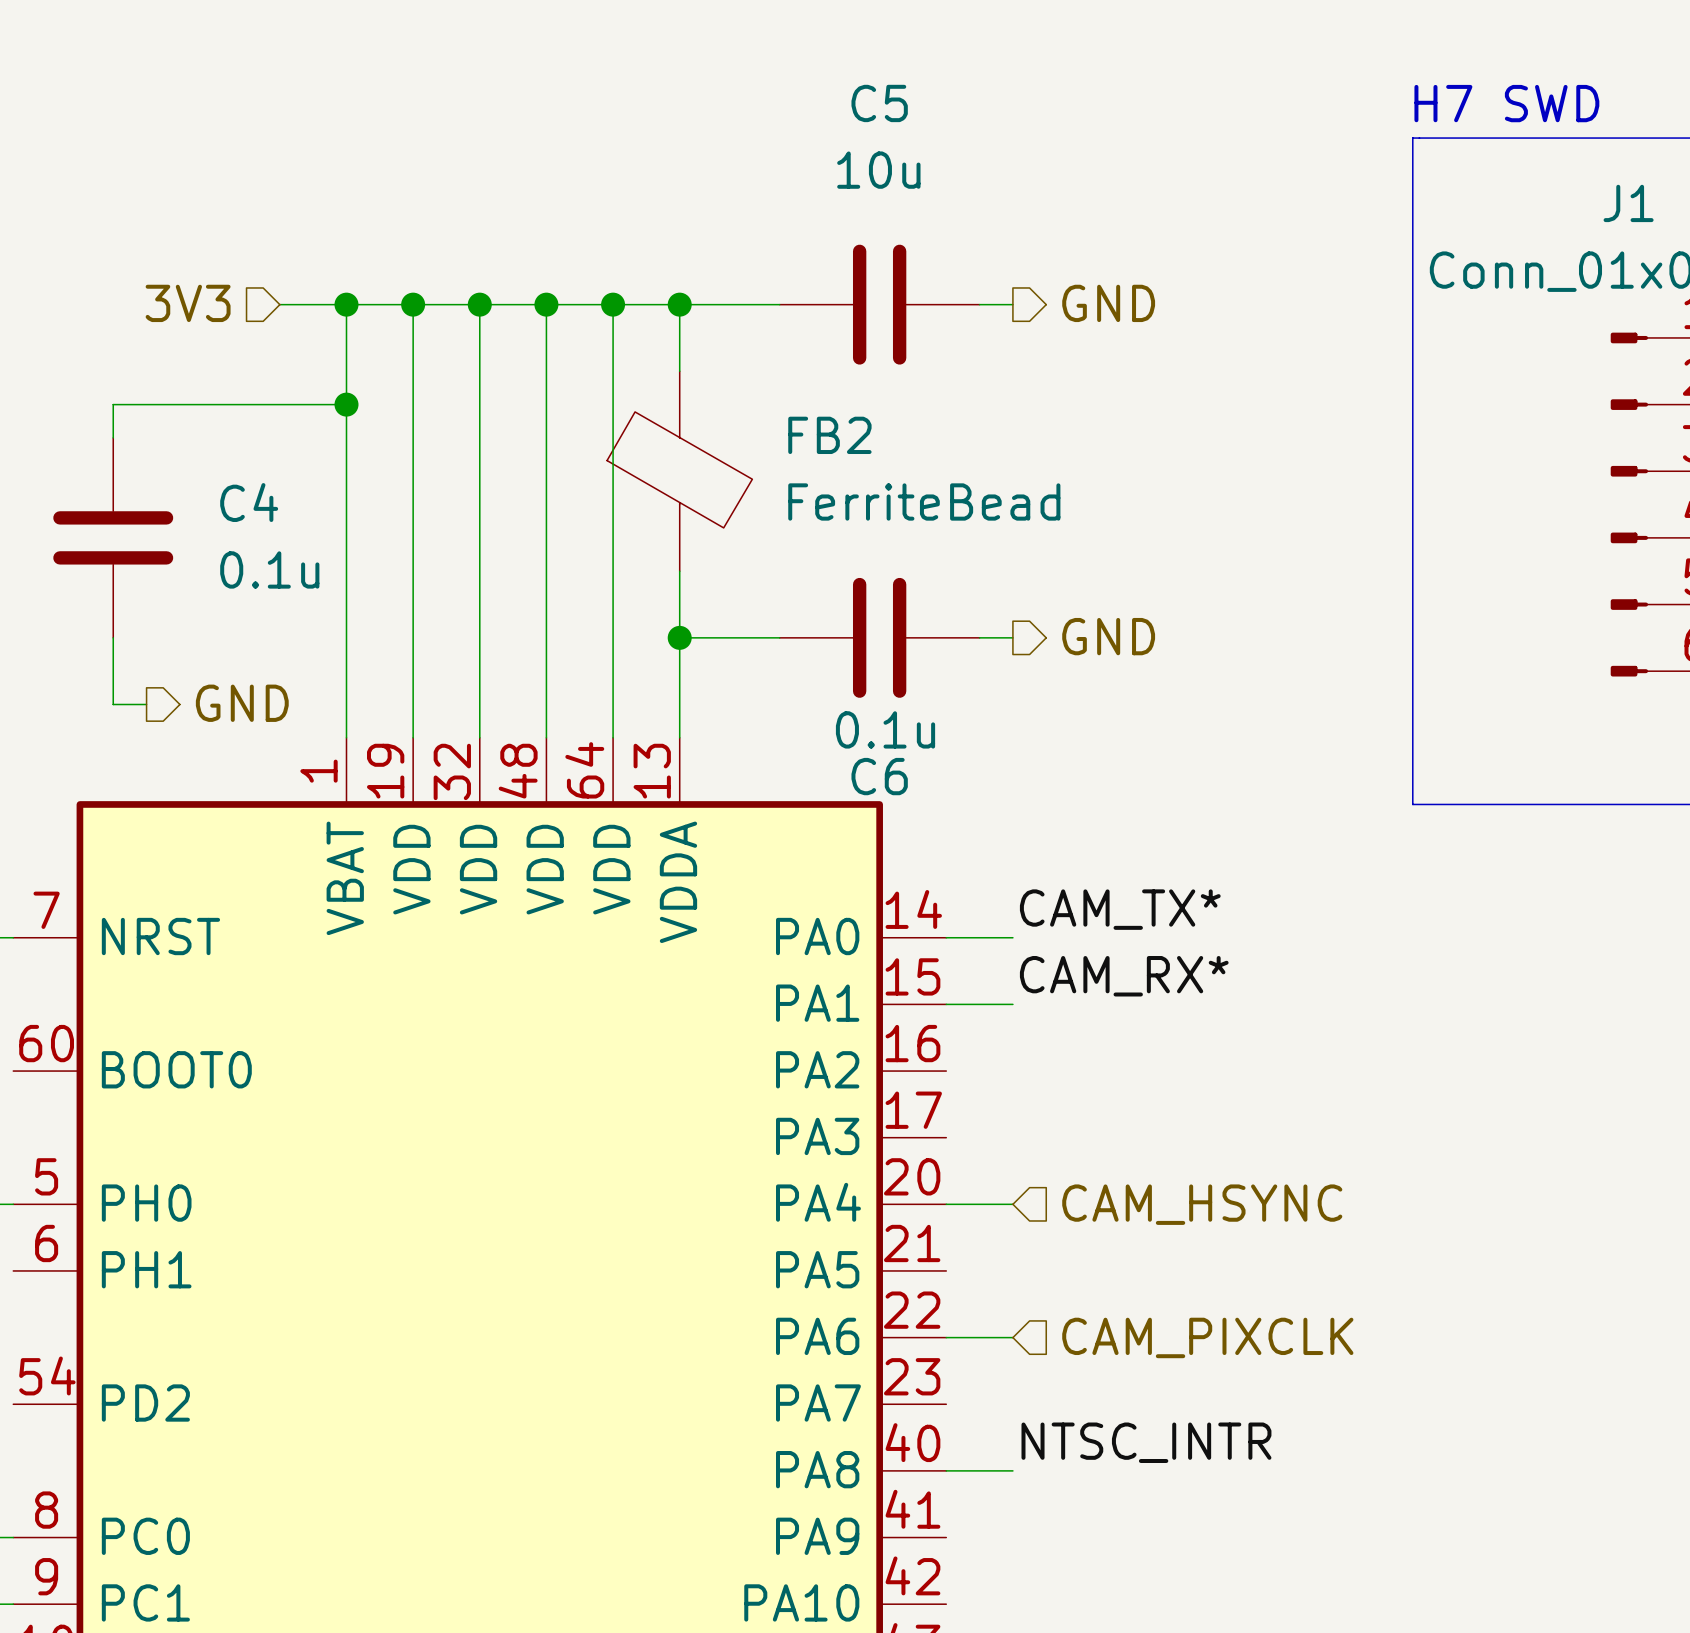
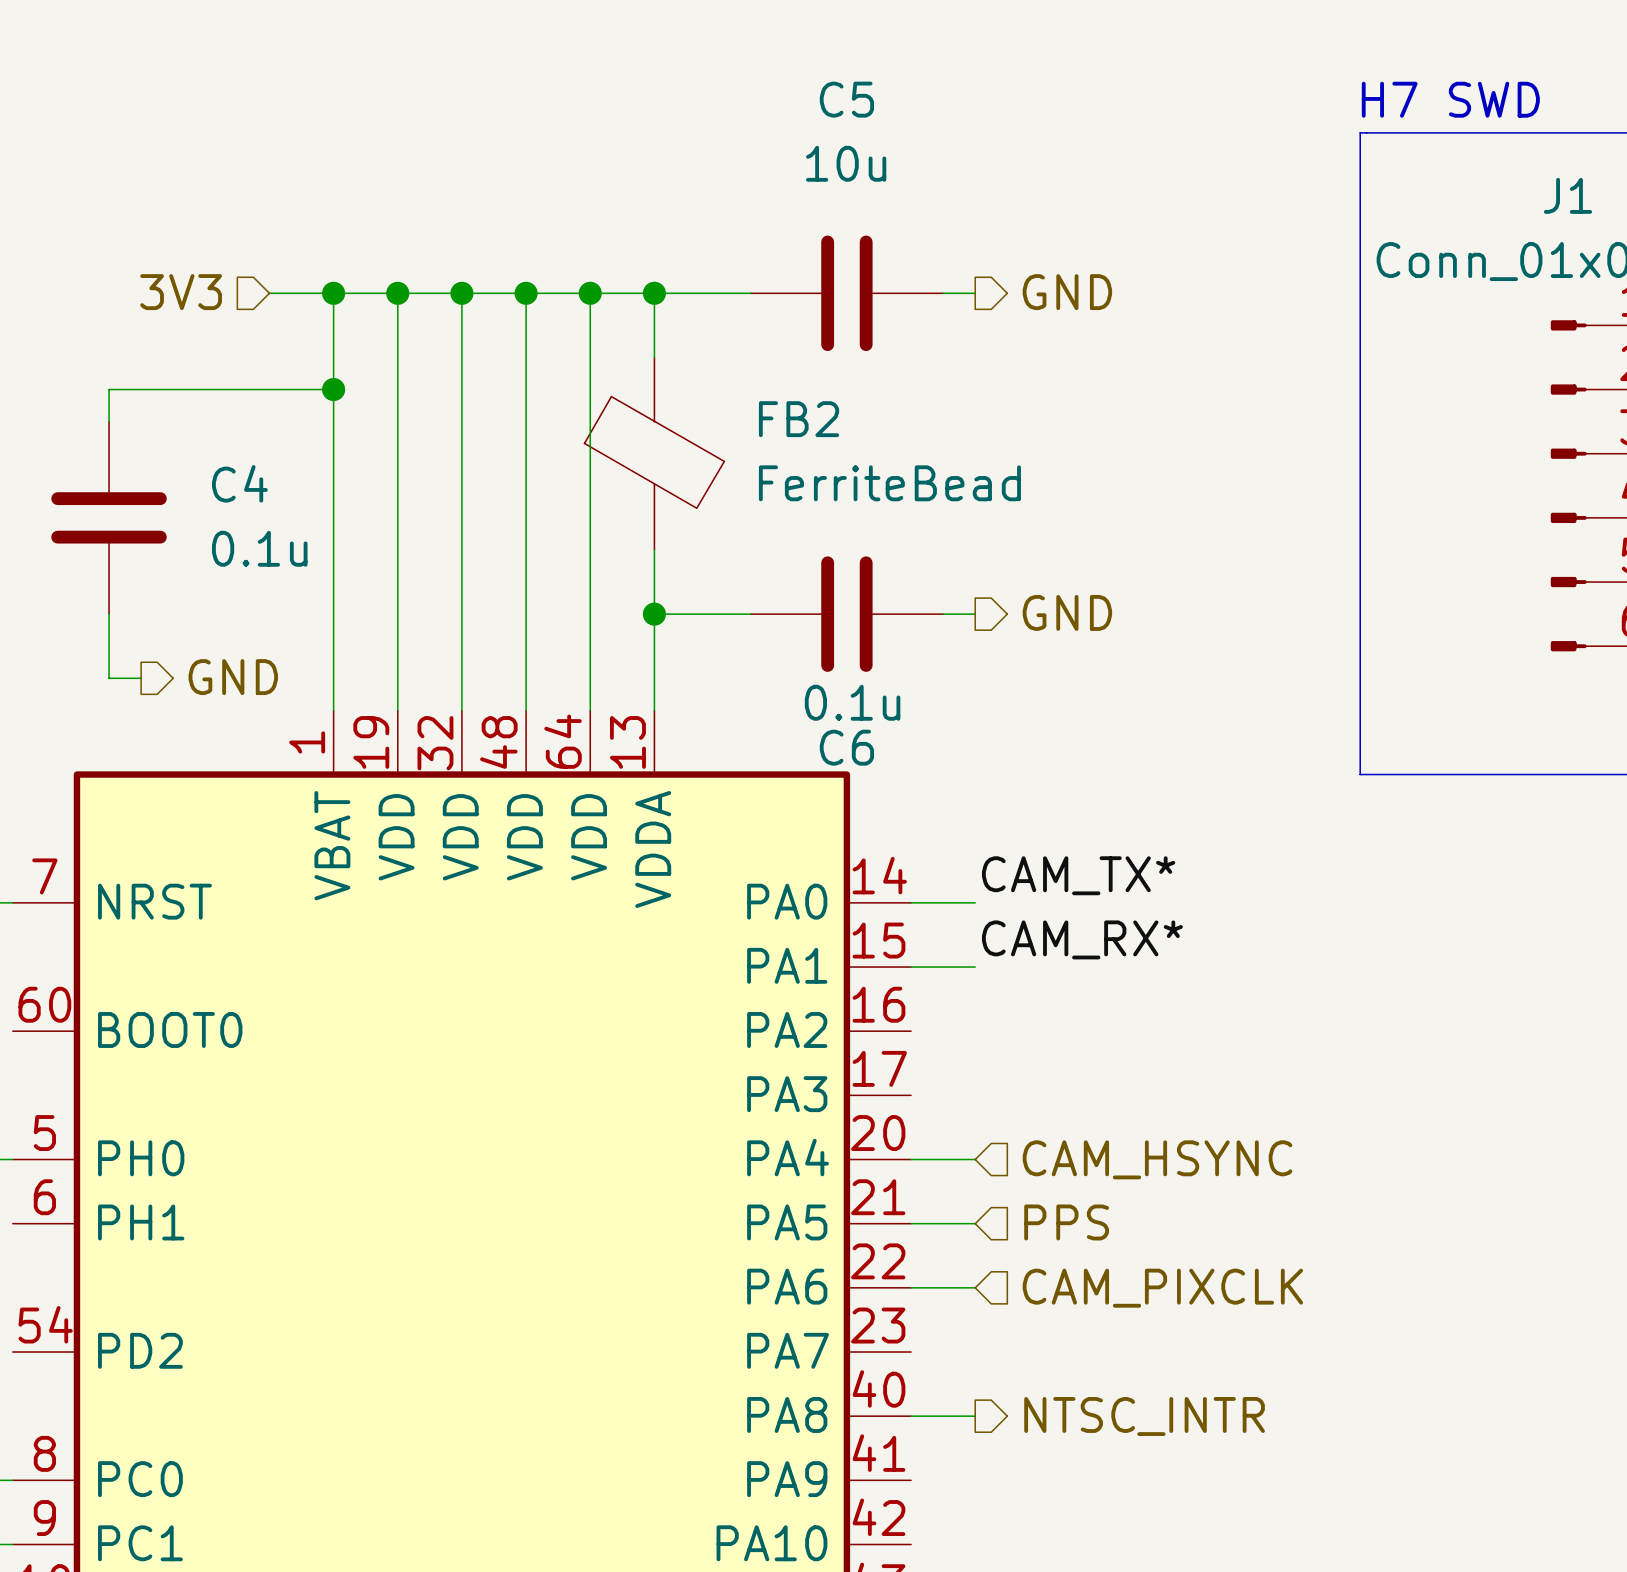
hierarchical label: none -> PPS (1066, 1222)
wire: none -> (911, 1223) (975, 1223)
label: NTSC_INTR (1146, 1442) -> none
hierarchical label: none -> NTSC_INTR (1144, 1416)

